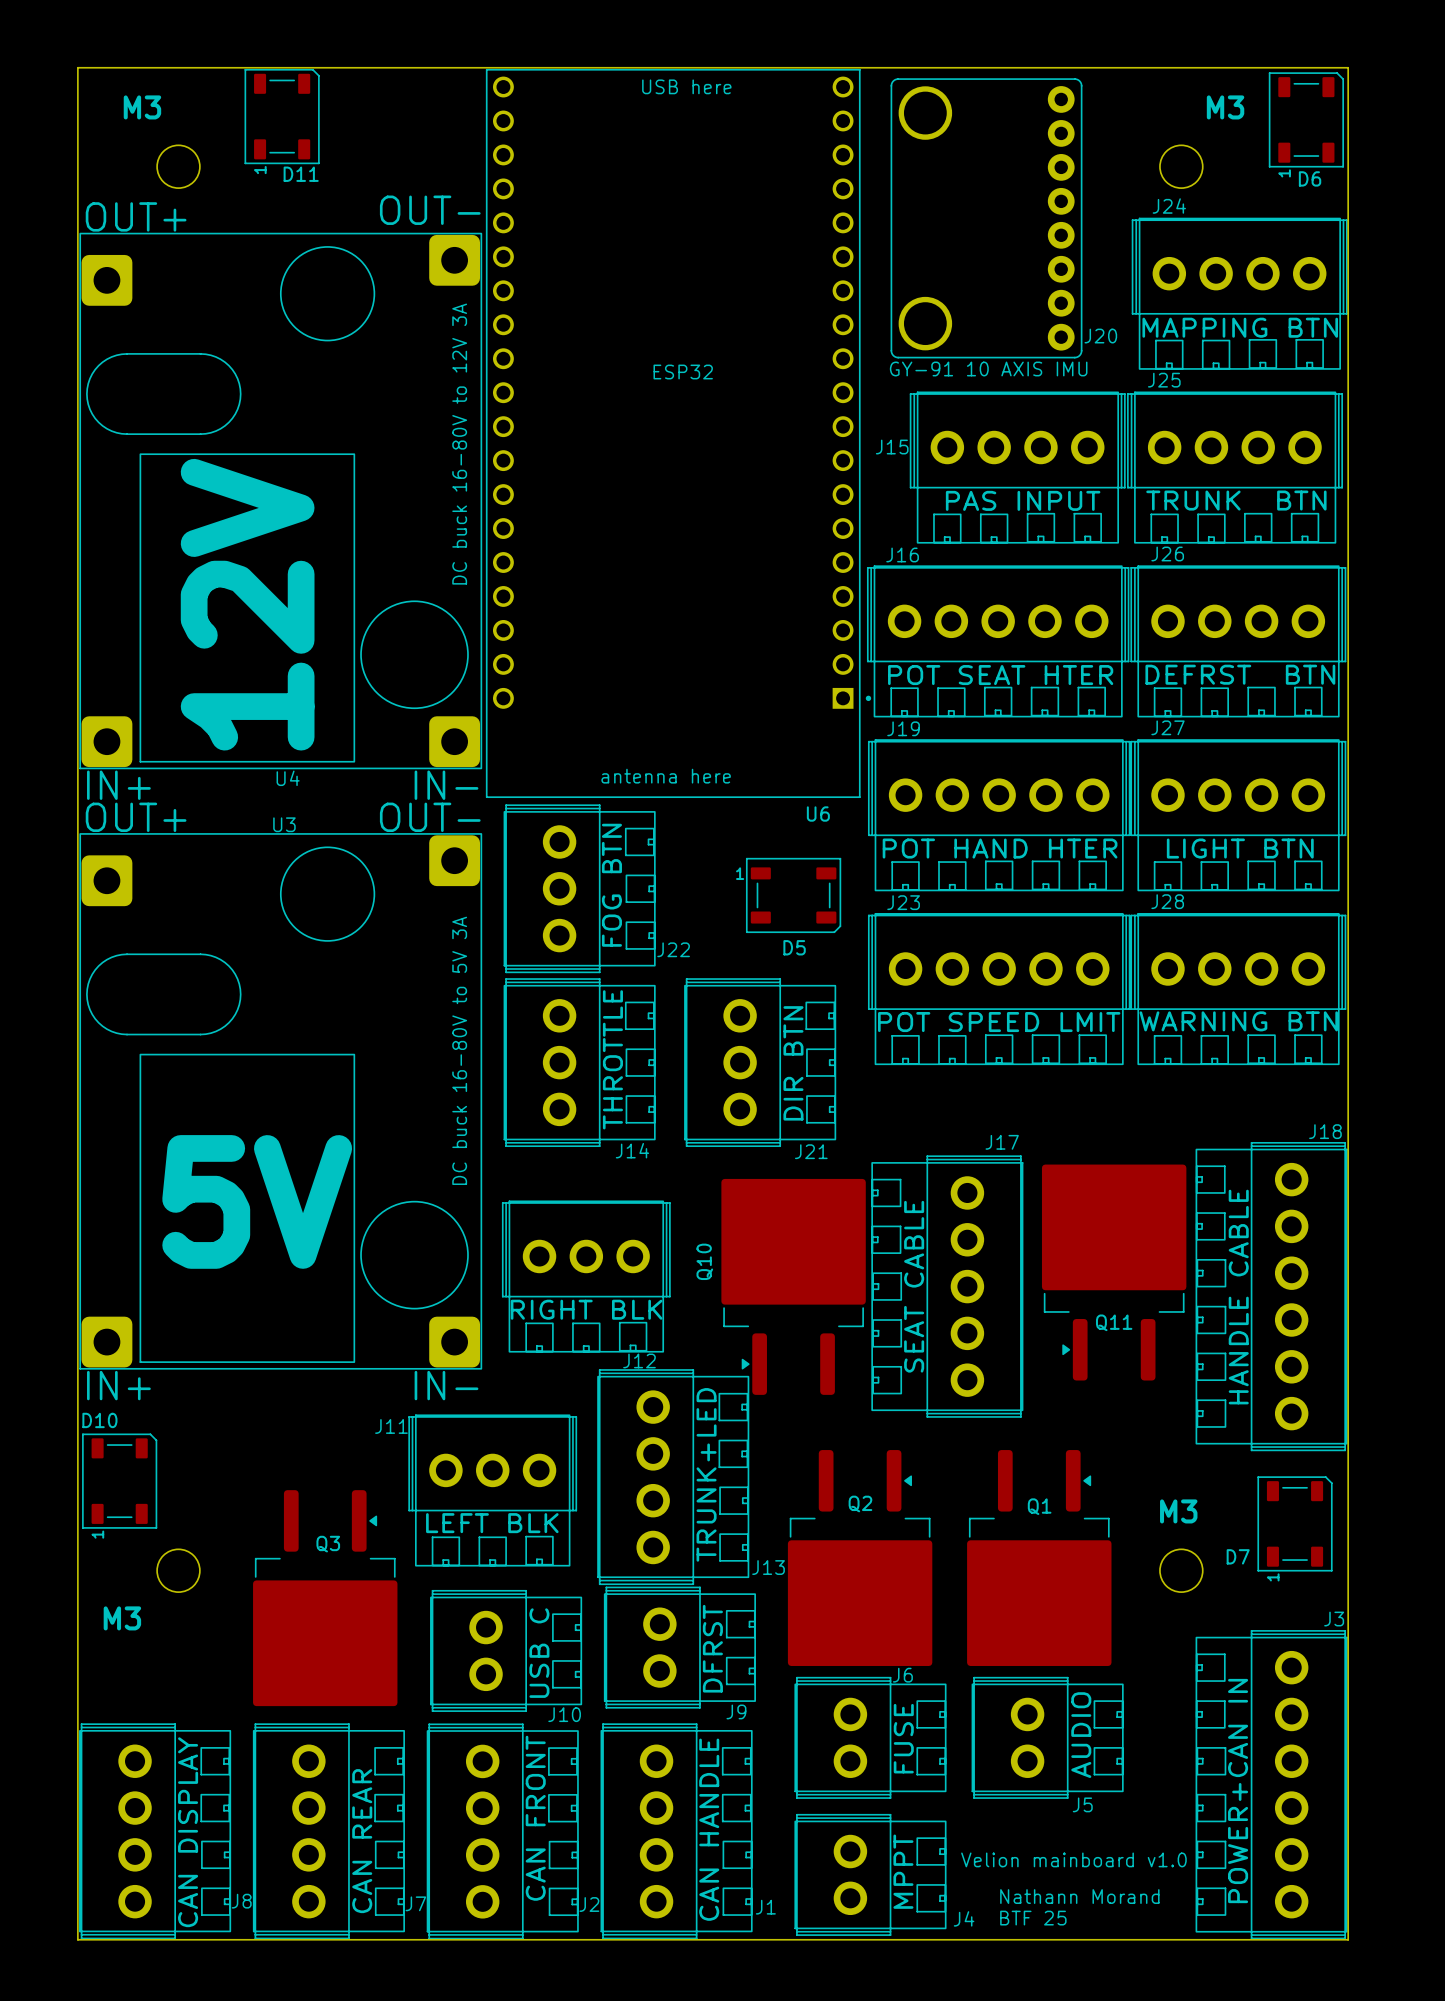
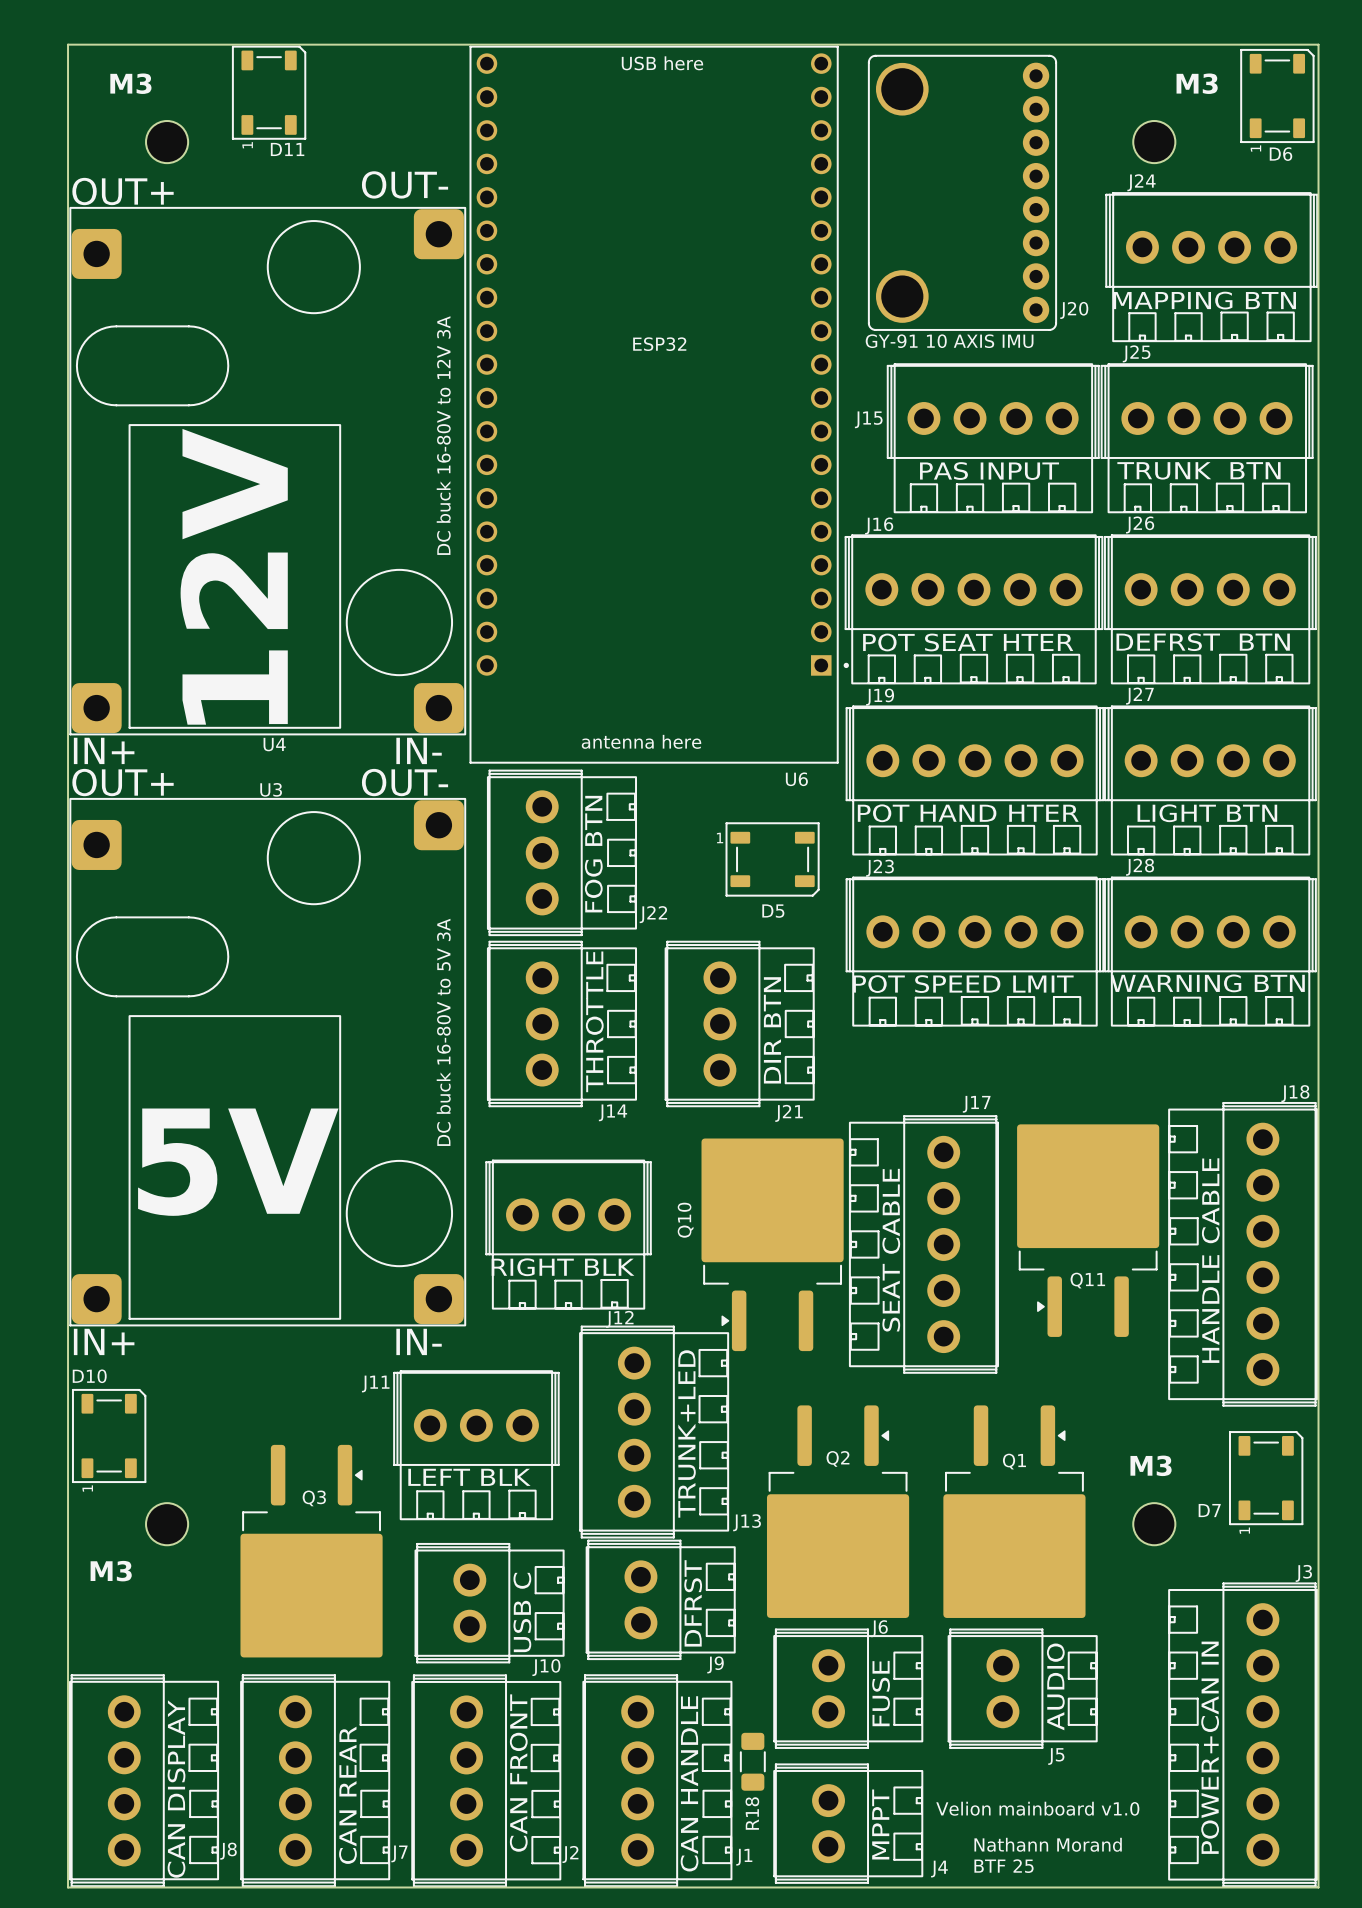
R18: none -> (752, 1761)

